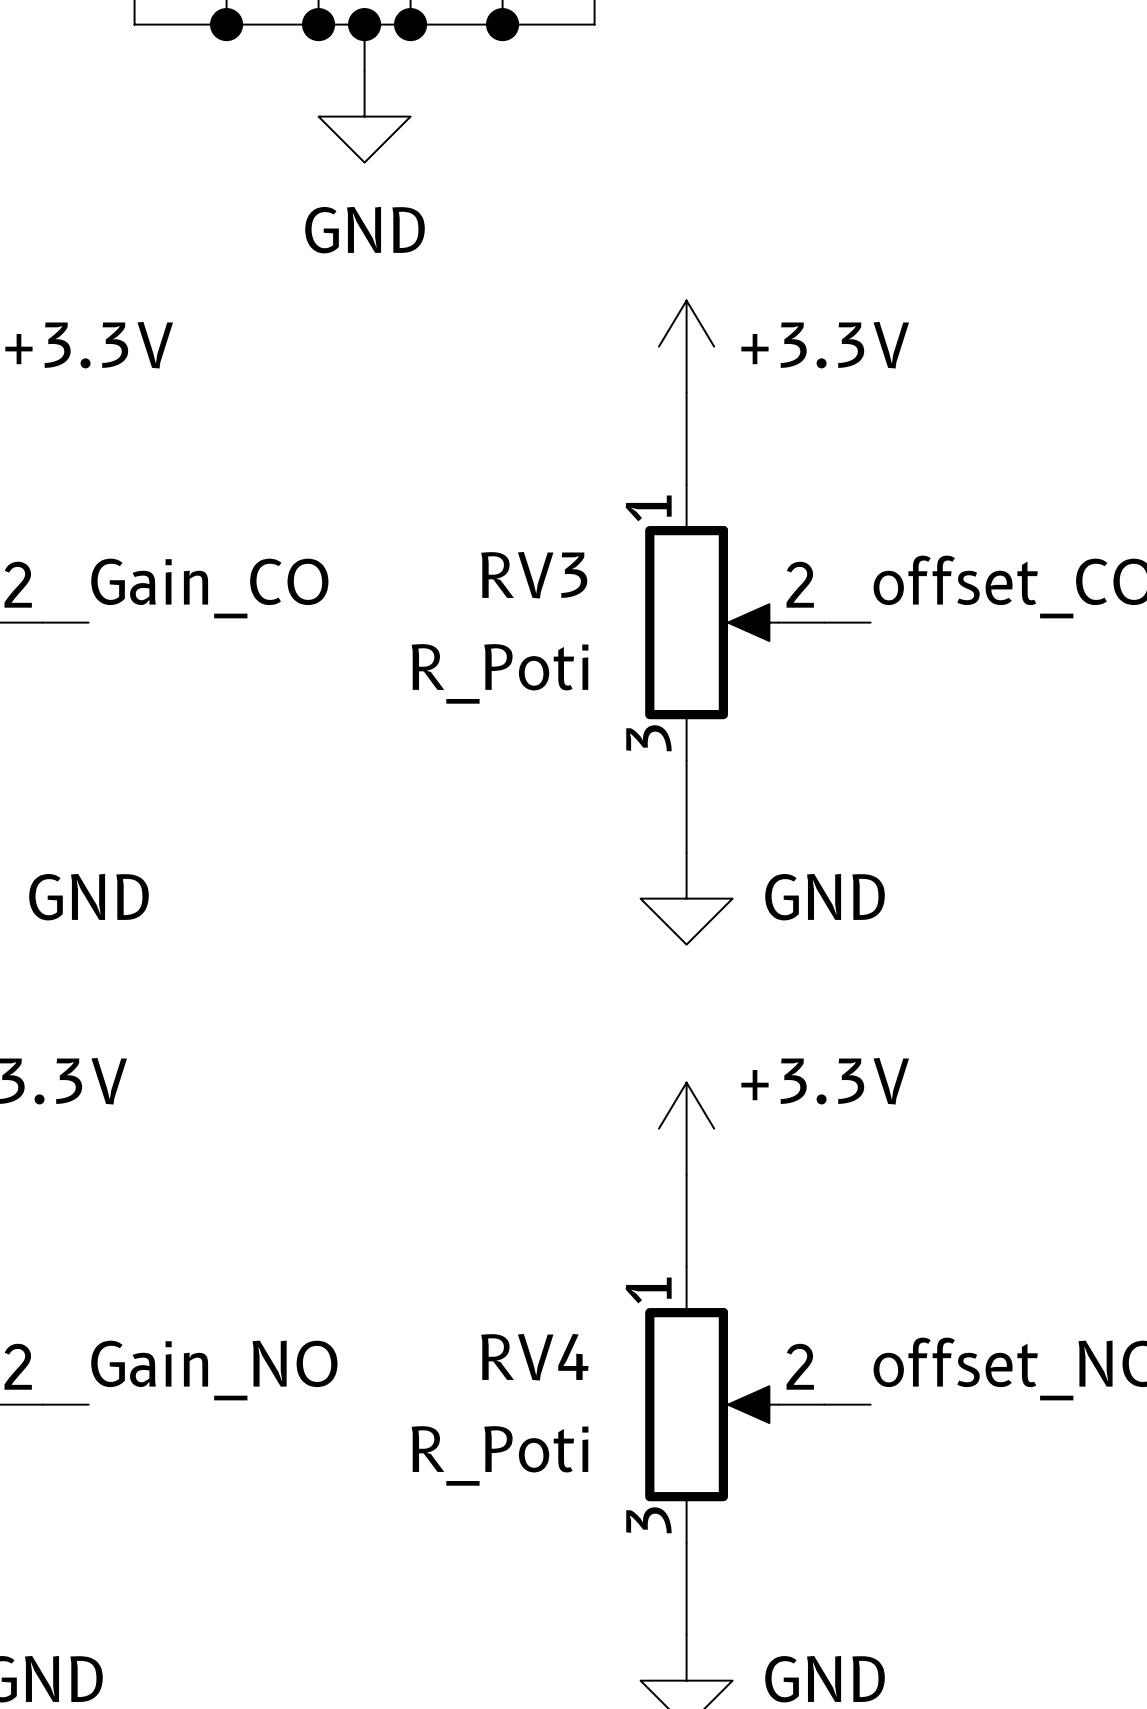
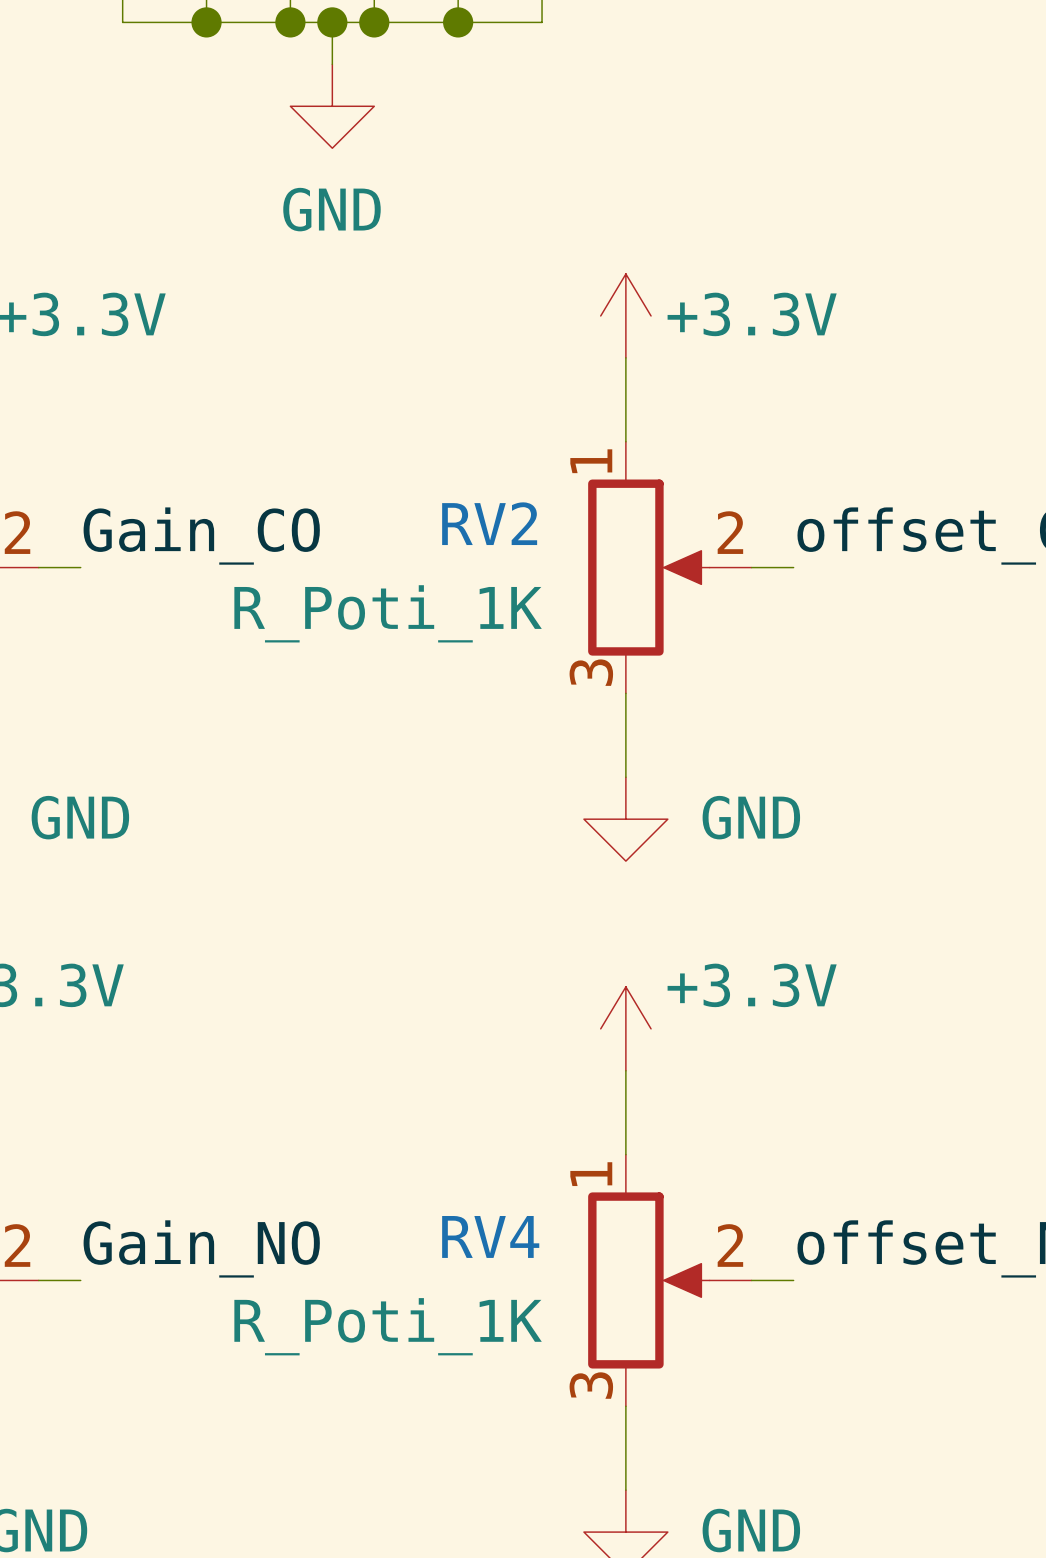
RV3 name: RV3 (534, 575) -> RV2 (489, 523)
RV3 value: R_Poti (500, 673) -> R_Poti_1K (388, 613)
RV4 value: R_Poti (500, 1455) -> R_Poti_1K (388, 1326)

